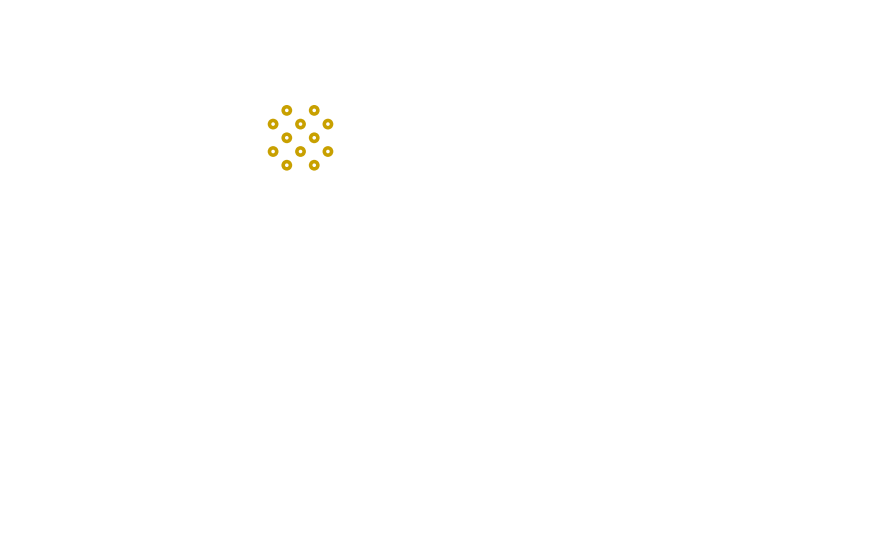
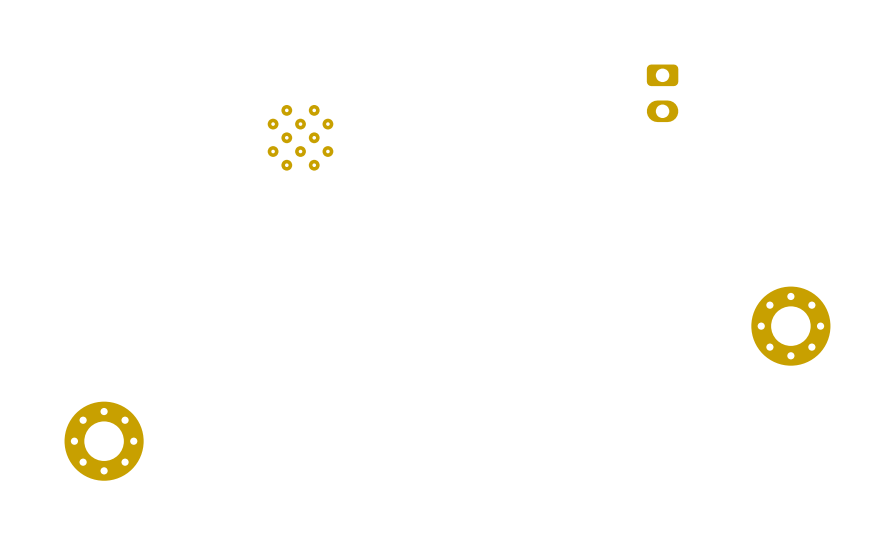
part: none -> (662, 93)
part: none -> (790, 326)
part: none -> (104, 441)

